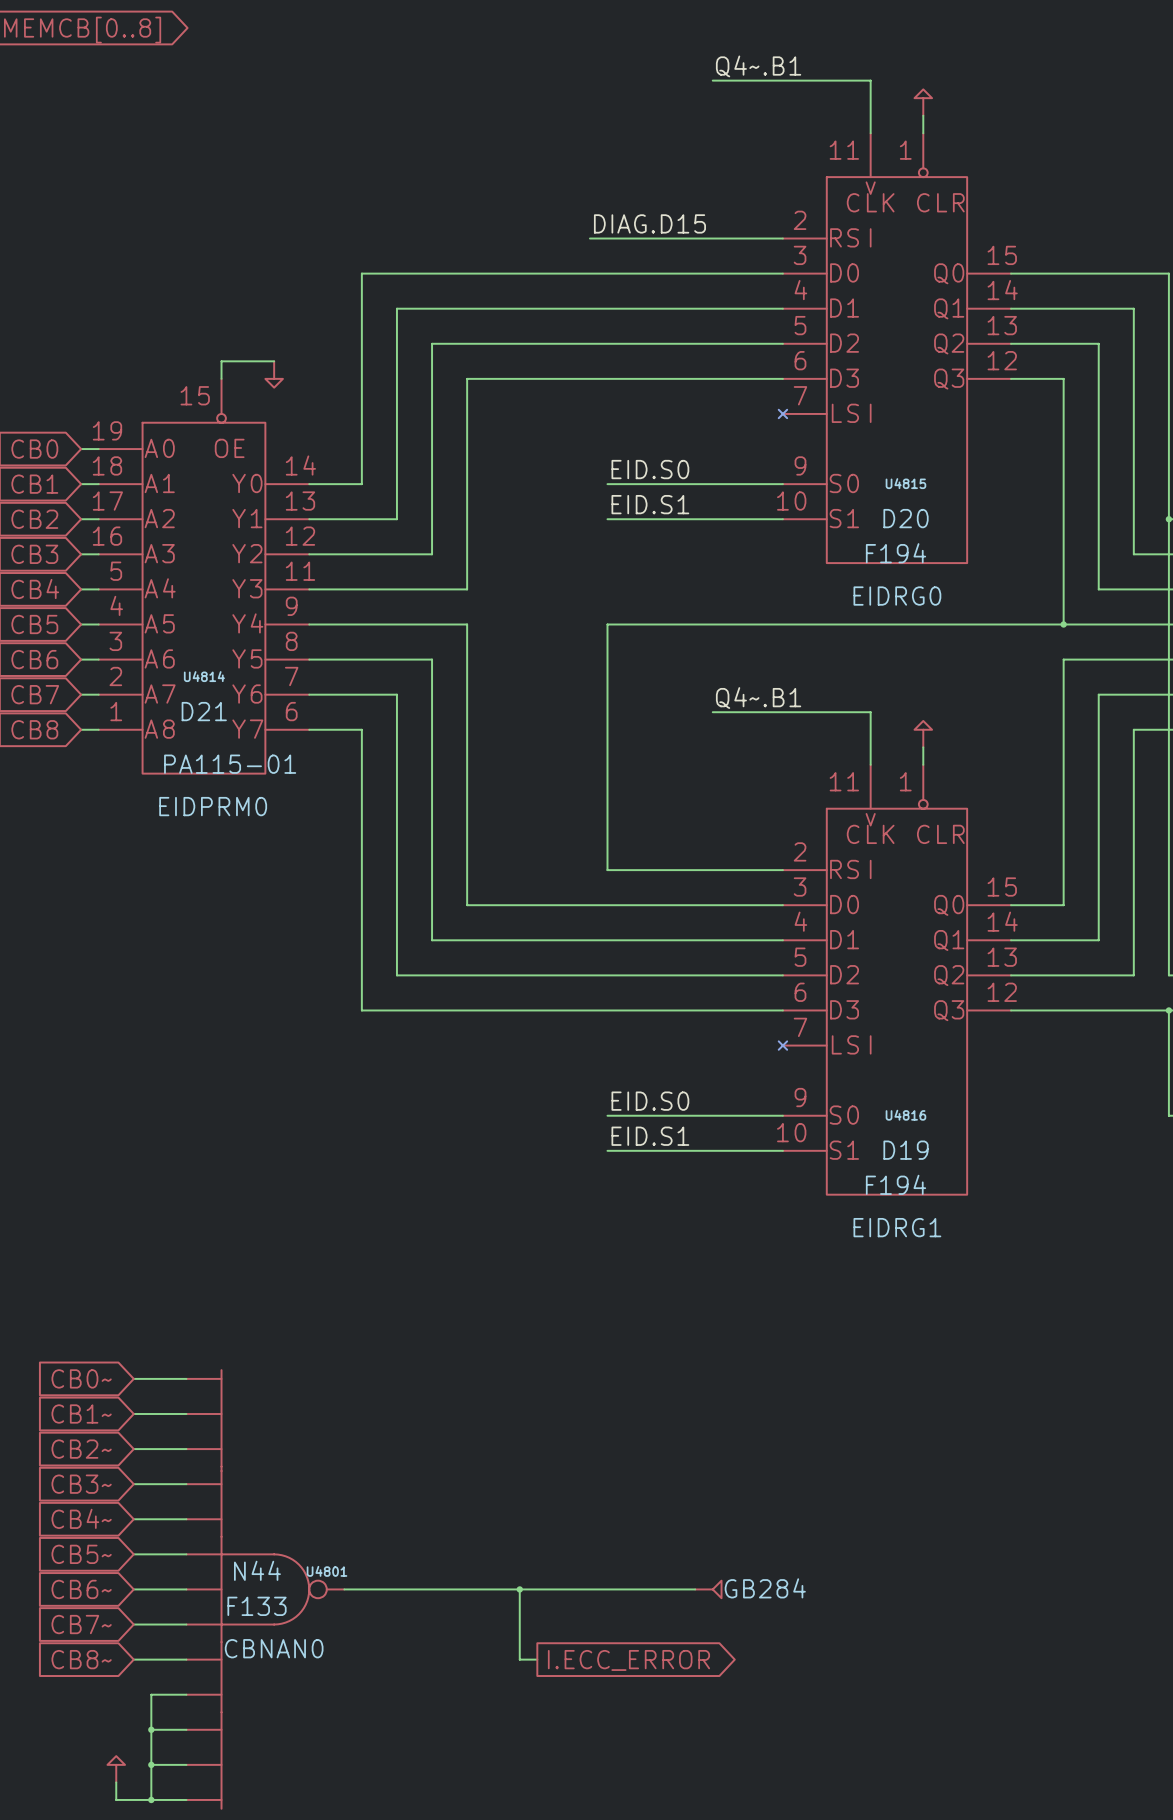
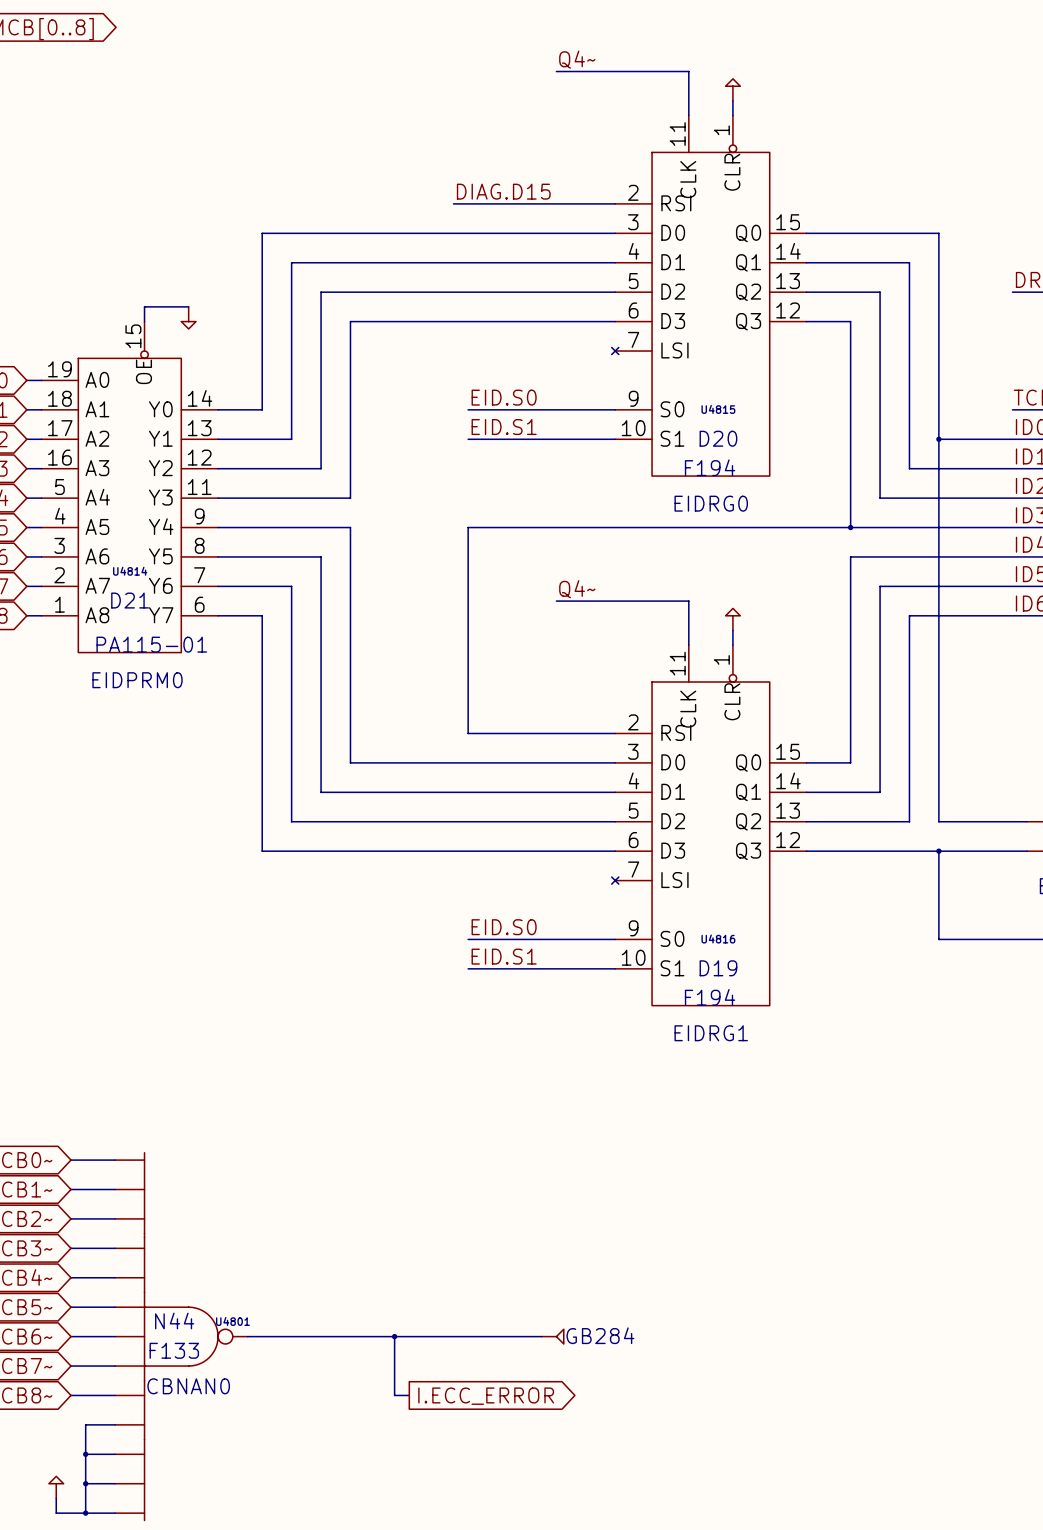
label: Q4~.B1 (758, 66) -> Q4~ (577, 59)
U4815 symbol: [782, 133, 1012, 564] -> [615, 115, 807, 477]
U4814 symbol: [98, 378, 310, 774] -> [41, 321, 219, 653]
label: Q4~.B1 (758, 698) -> Q4~ (577, 589)
U4816 symbol: [782, 764, 1012, 1195] -> [615, 645, 807, 1006]

